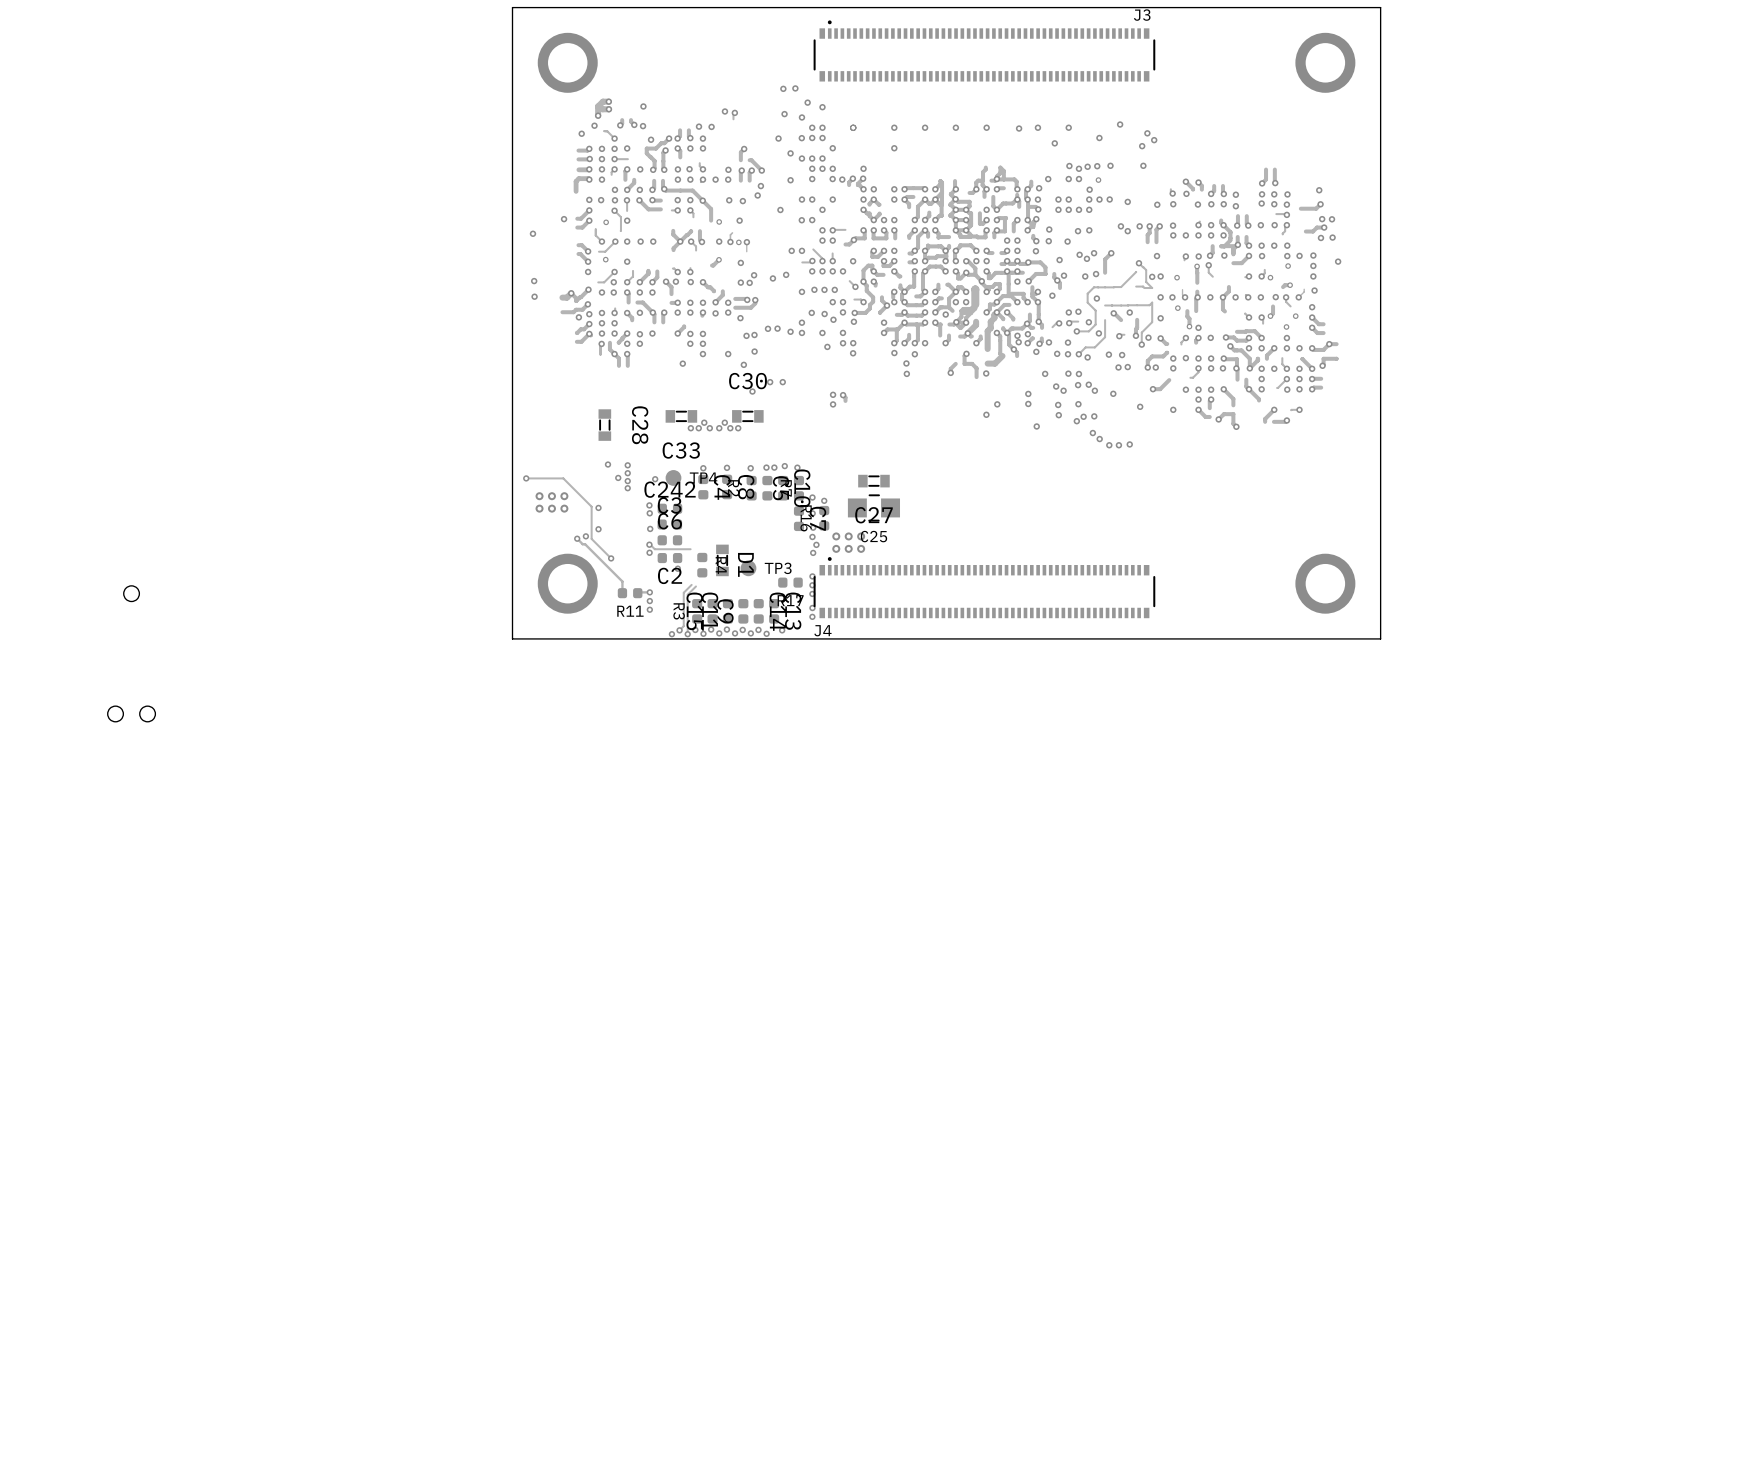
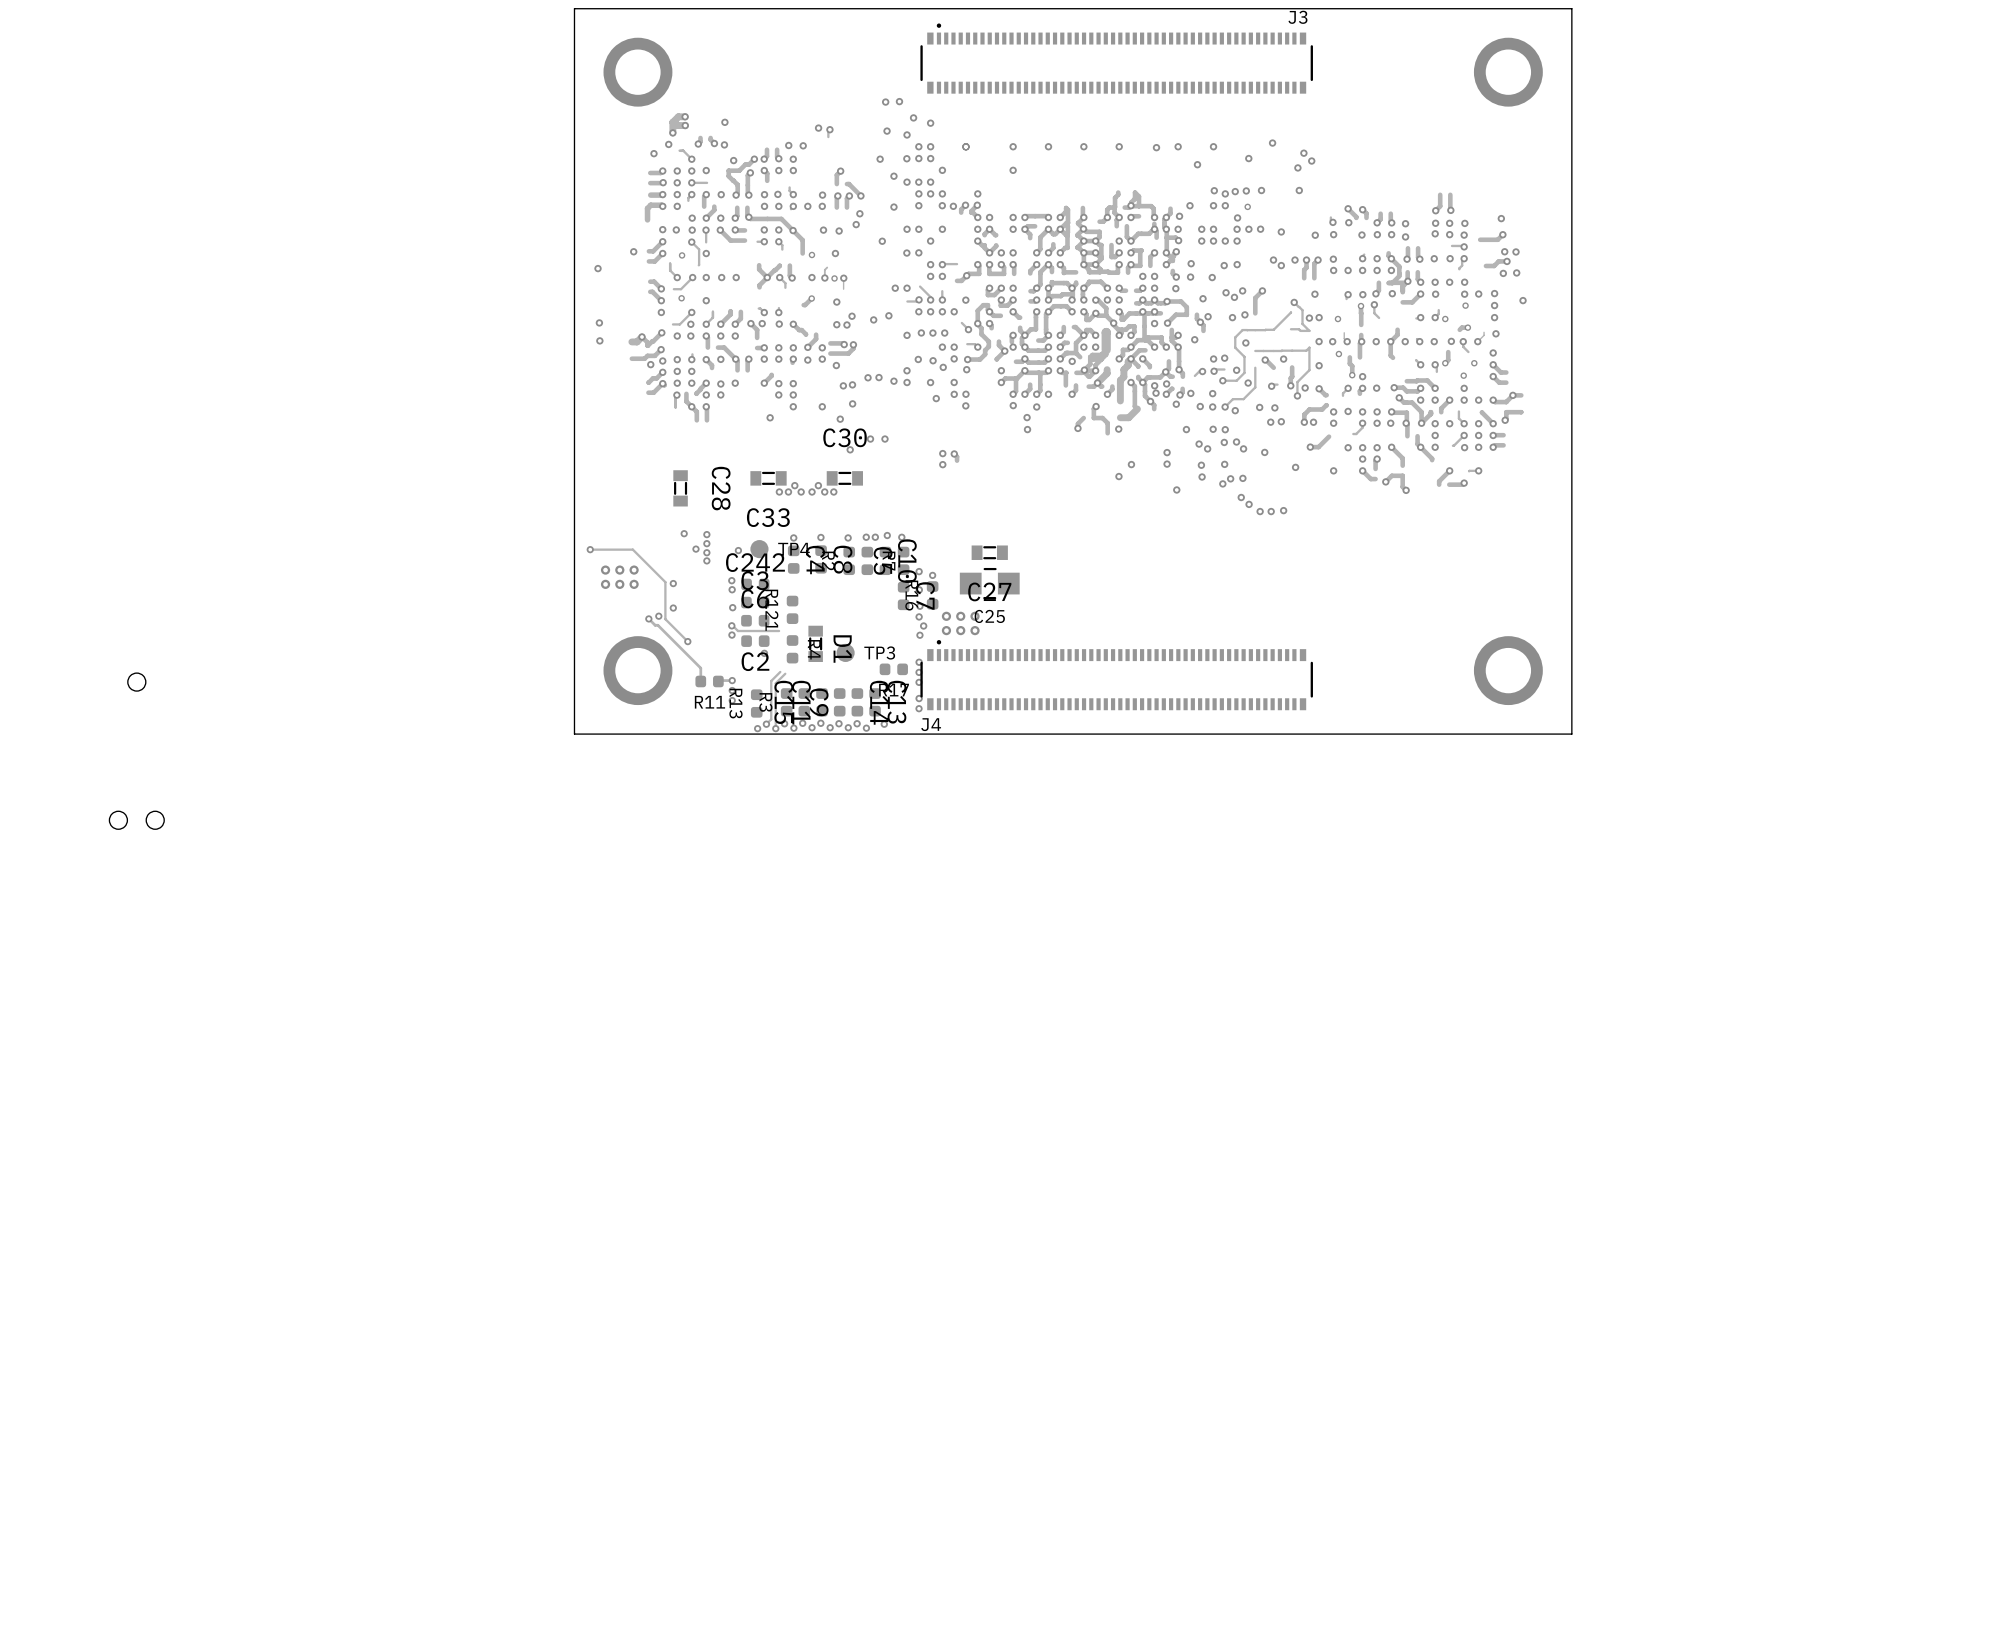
R121: none -> (792, 609)
R13: none -> (756, 703)

